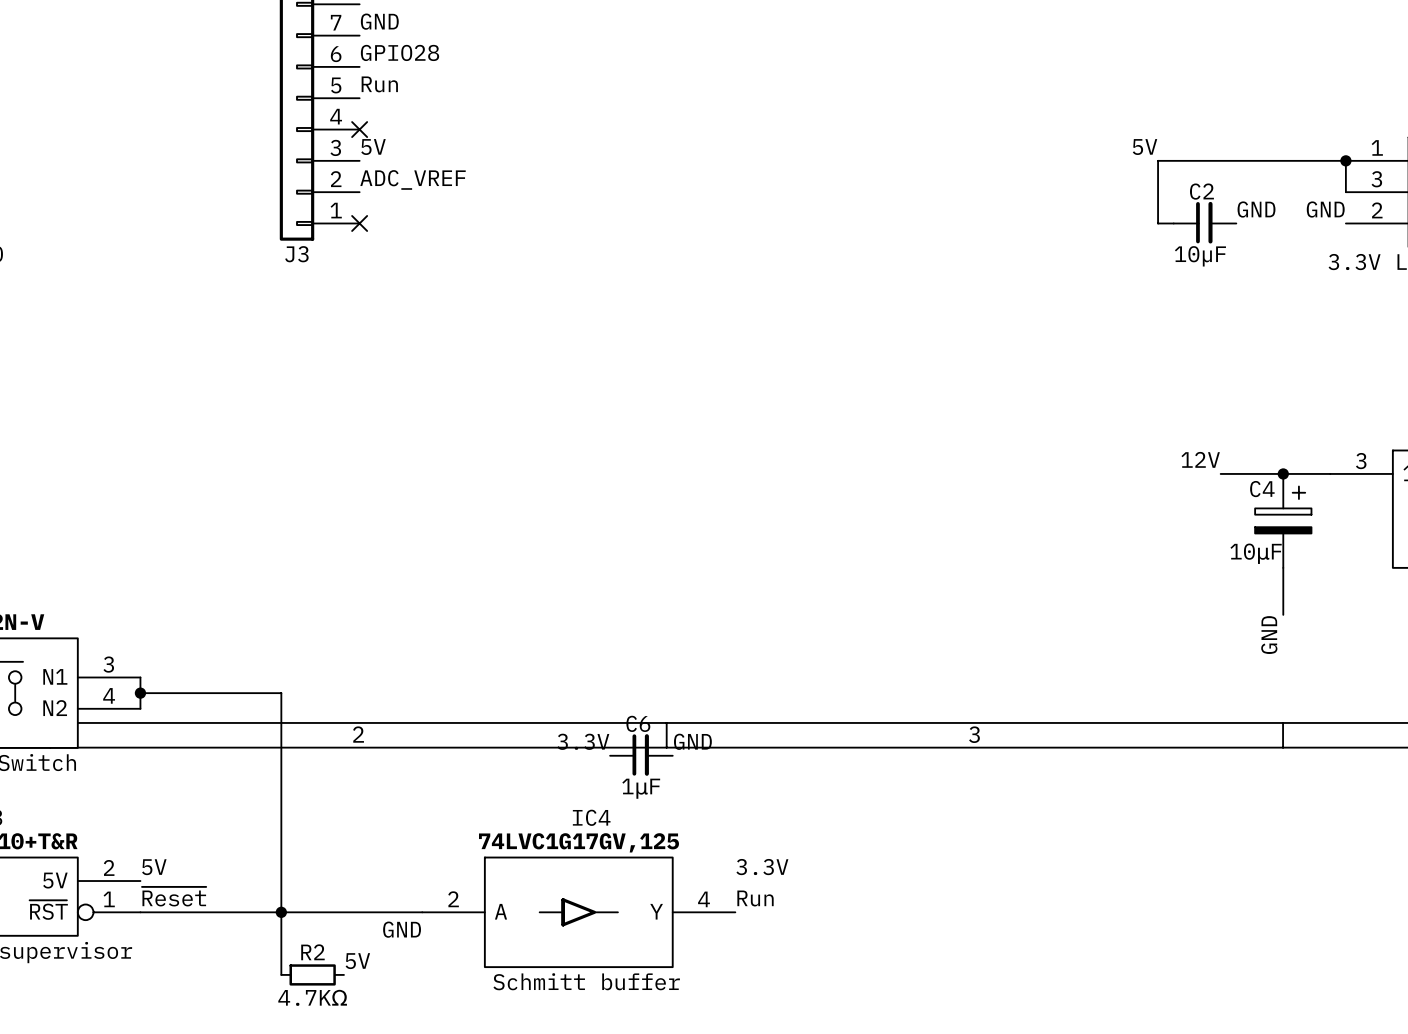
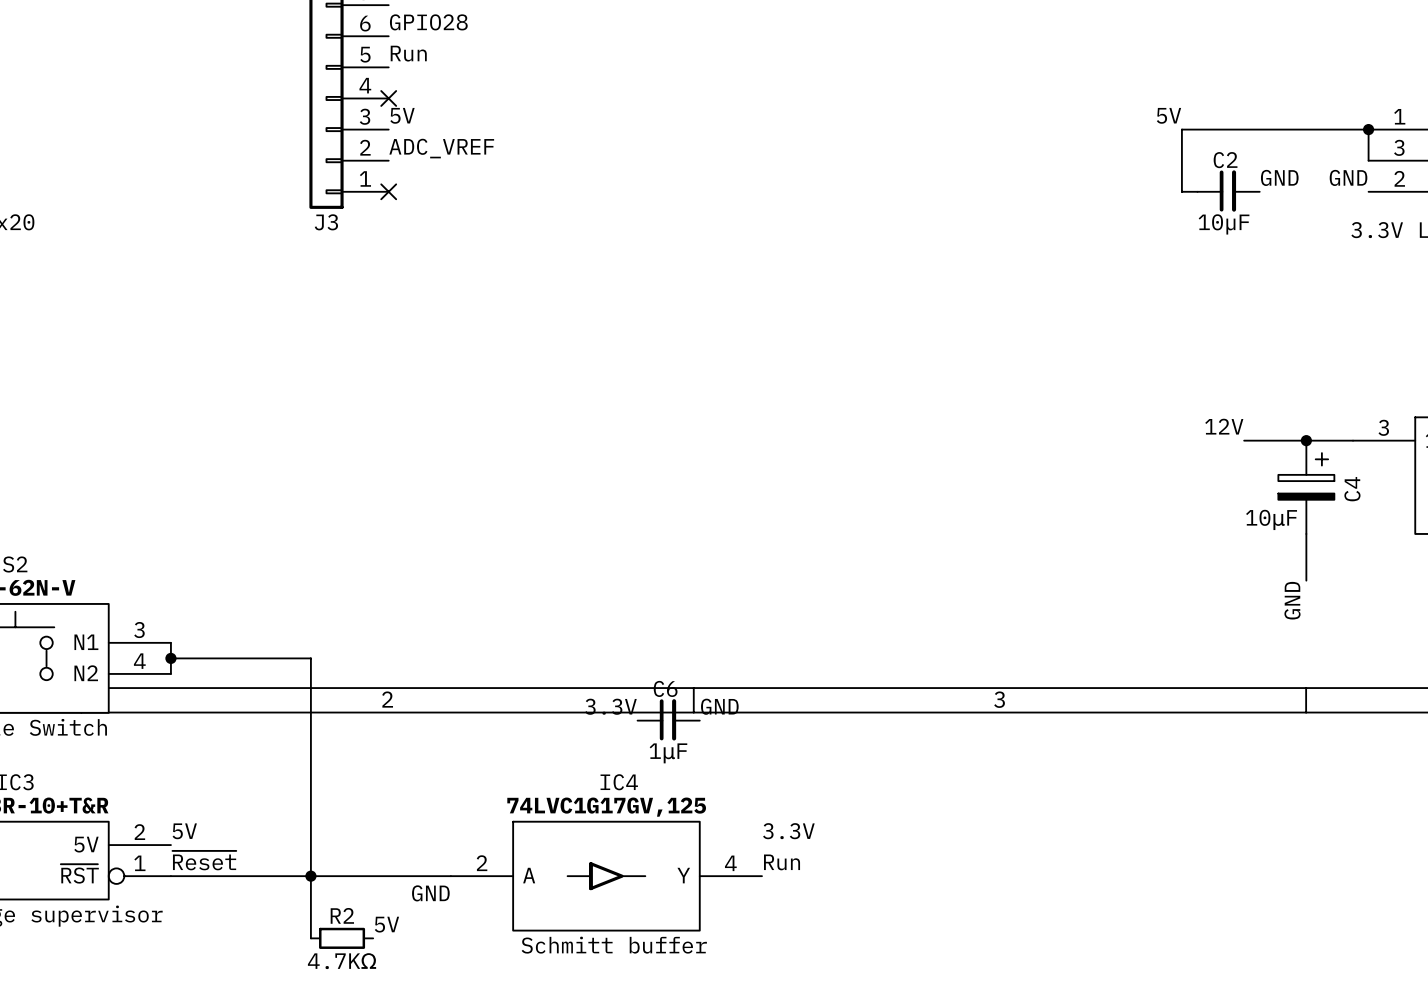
C4 name rotation: 0° (1262, 489) -> 90° counterclockwise (1352, 489)
C4 name position: C4 (1262, 489) -> C4 (1352, 489)
C4 text: none -> 10μF (1271, 519)
C4 value: 10μF (1256, 553) -> none

